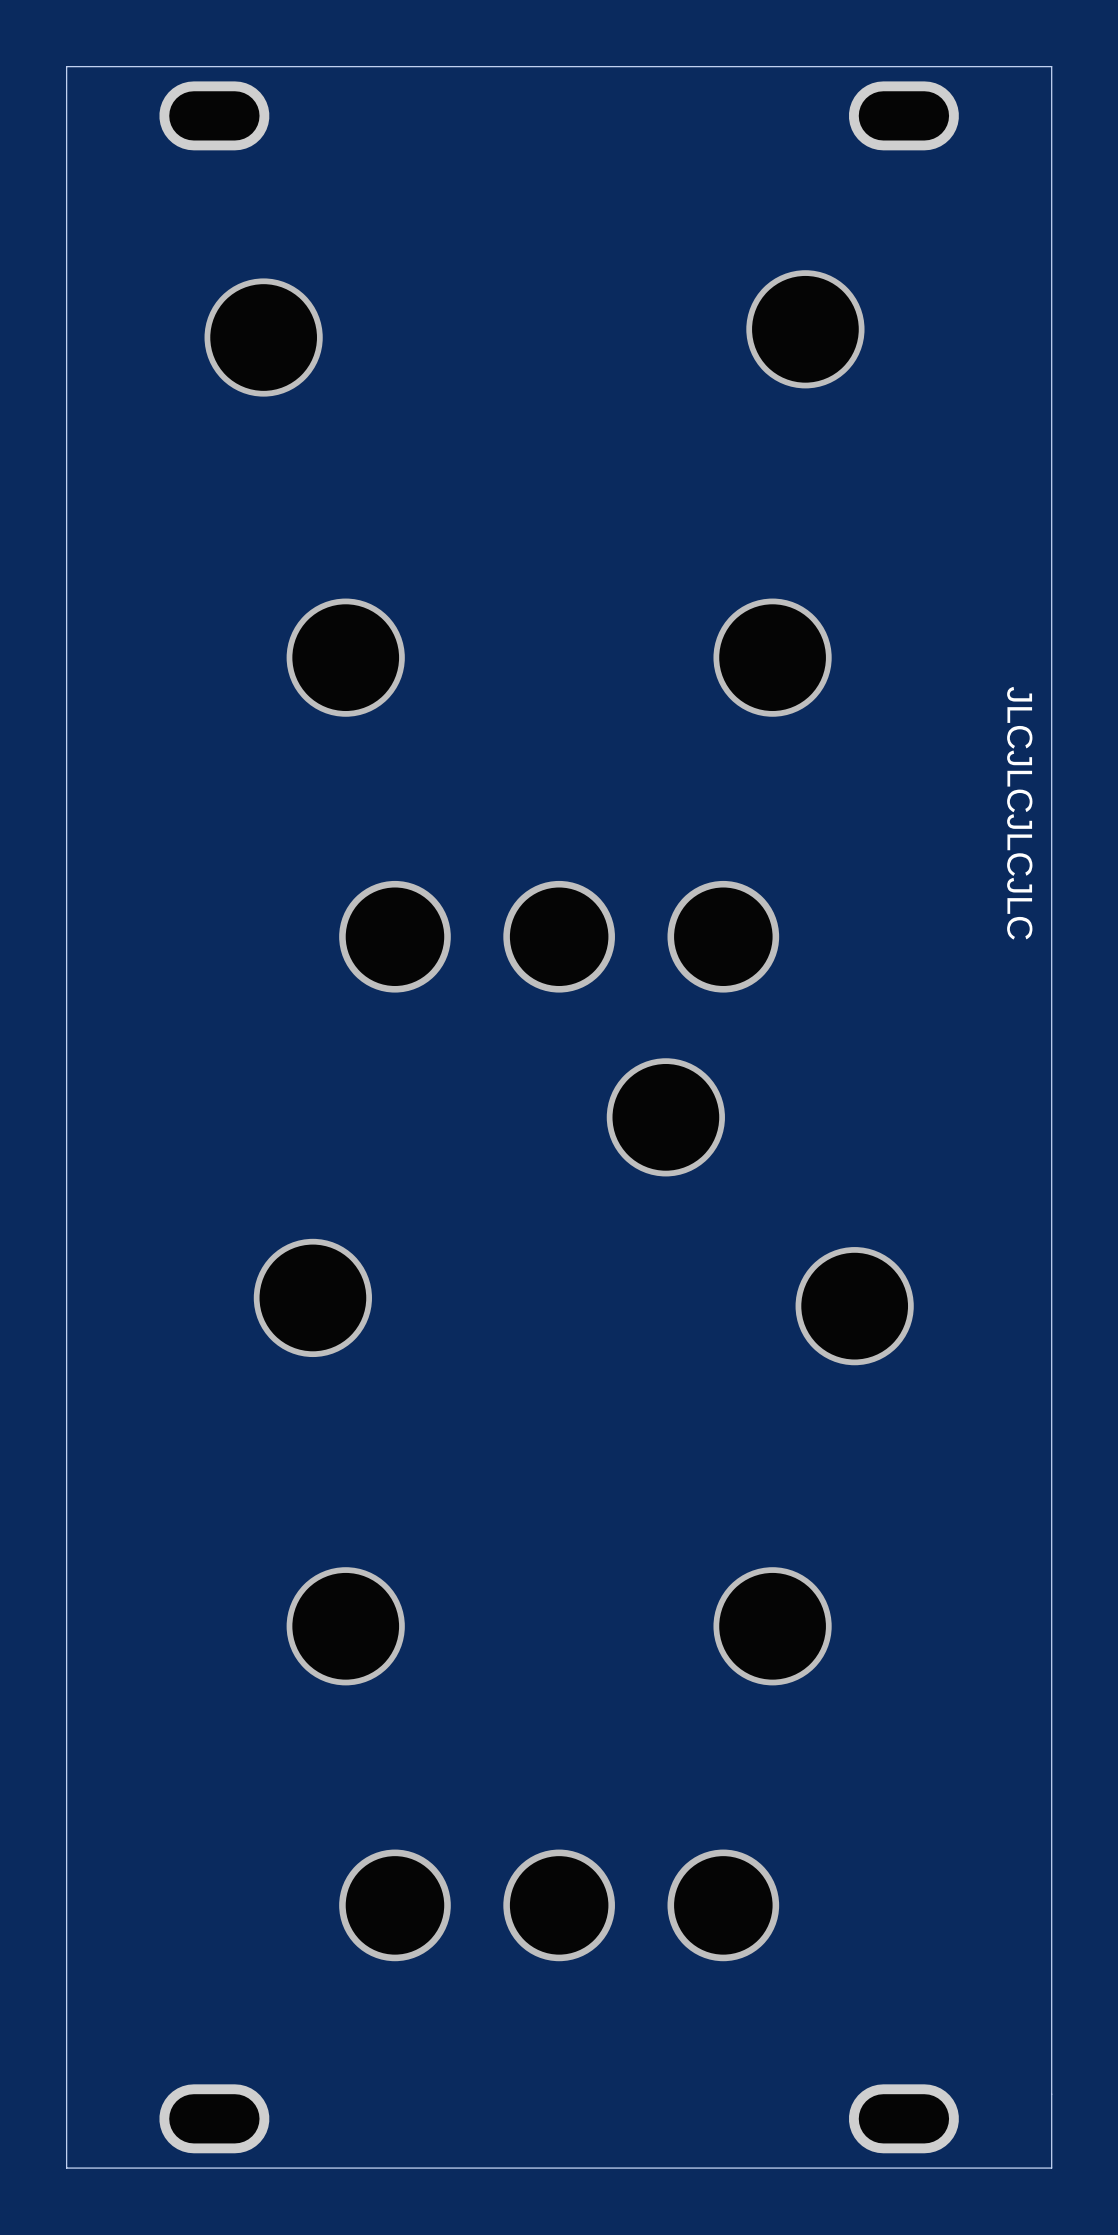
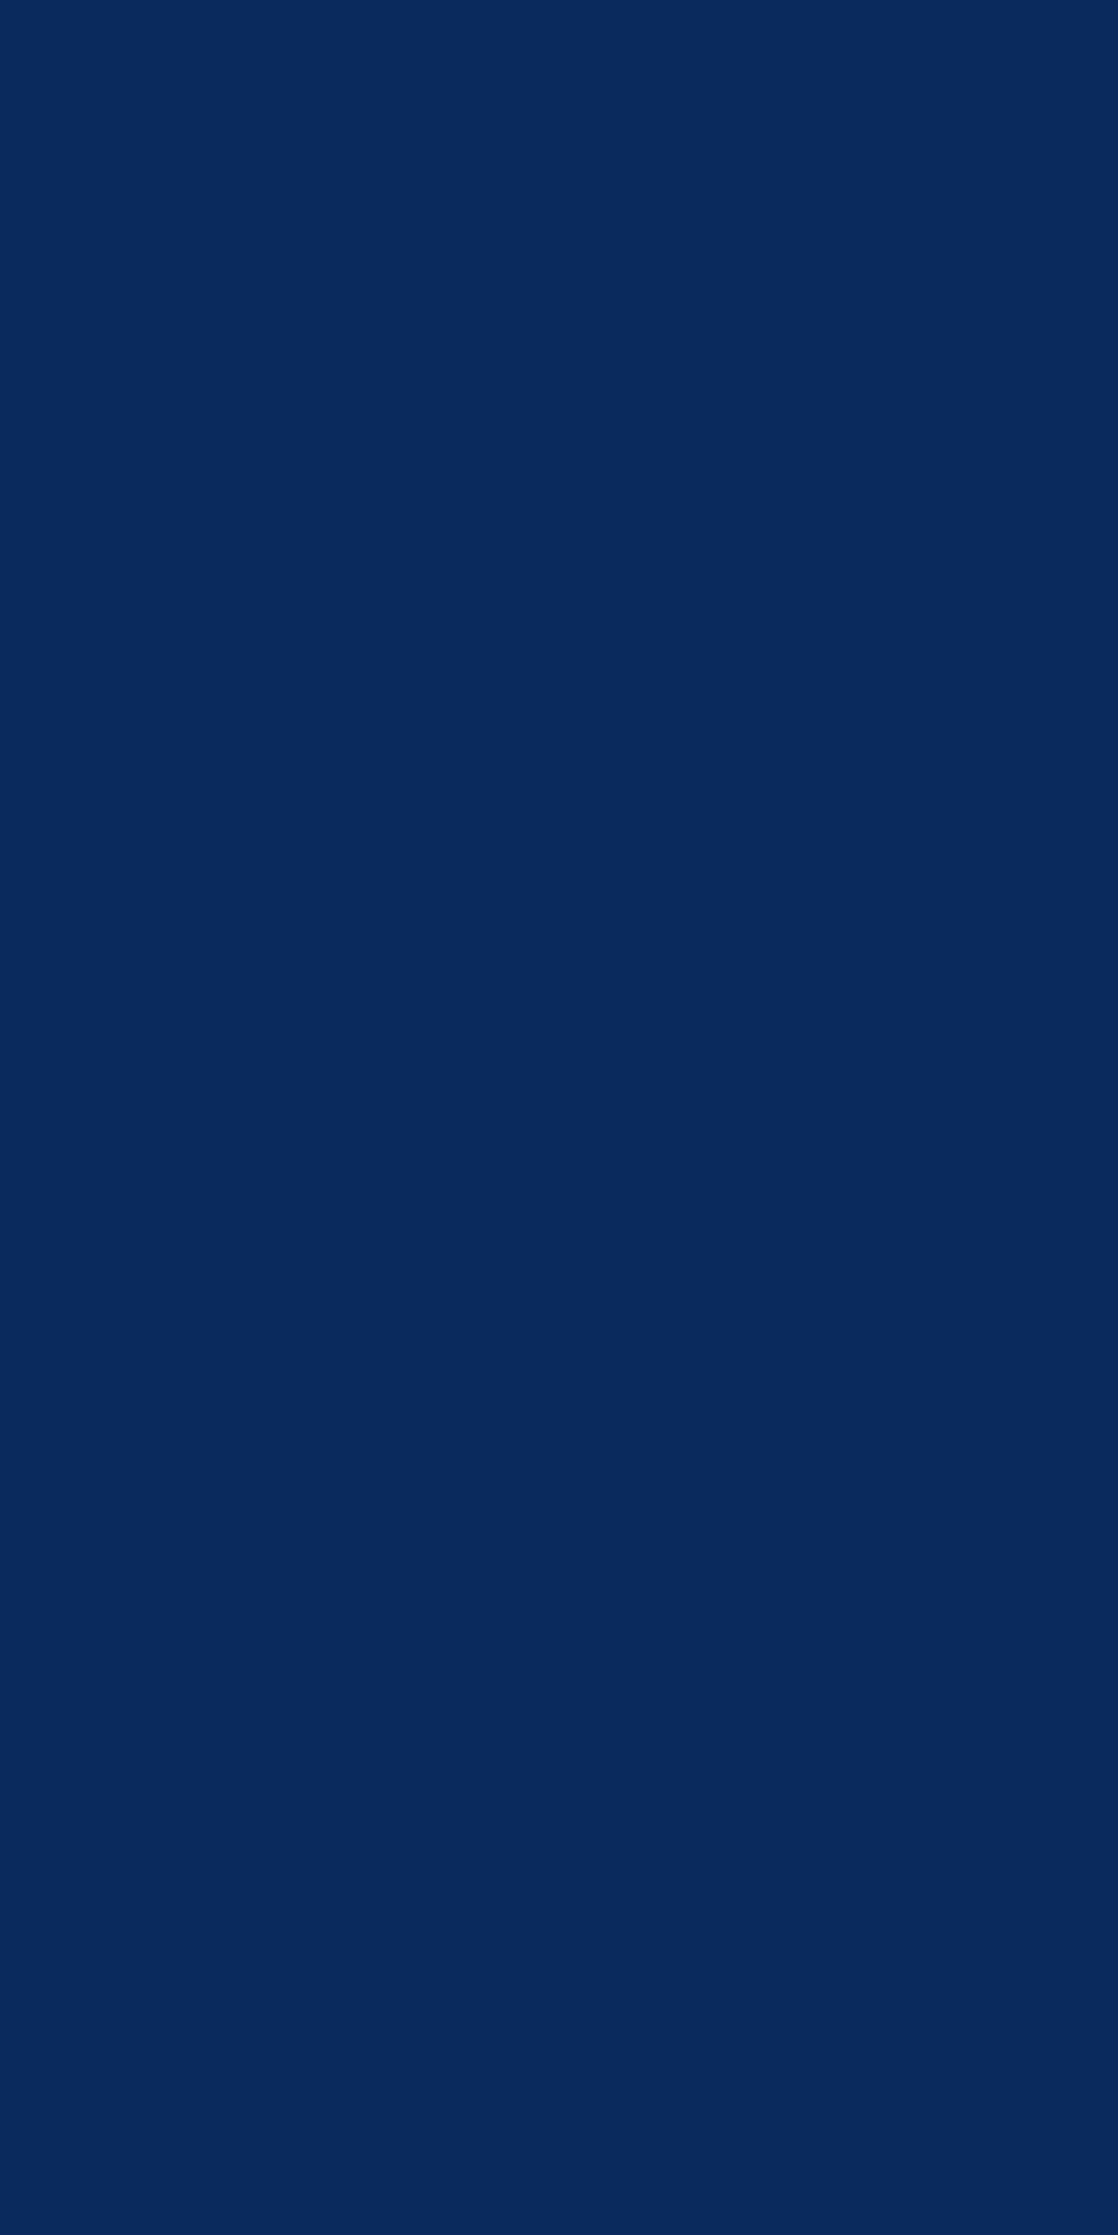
board edge: (1051, 66) (1051, 2168) (66, 2168) (66, 66) (1051, 66) -> none
part: (214, 115) -> none
part: (903, 115) -> none
via: (805, 329) -> none
via: (263, 337) -> none
via: (345, 657) -> none
via: (772, 657) -> none
text: JLCJLCJLCJLC (1019, 813) -> none
via: (394, 936) -> none
via: (559, 936) -> none
via: (723, 936) -> none
via: (665, 1117) -> none
via: (312, 1297) -> none
via: (854, 1306) -> none
via: (345, 1626) -> none
via: (772, 1626) -> none
via: (394, 1905) -> none
via: (559, 1905) -> none
via: (723, 1905) -> none
part: (214, 2118) -> none
part: (903, 2118) -> none

